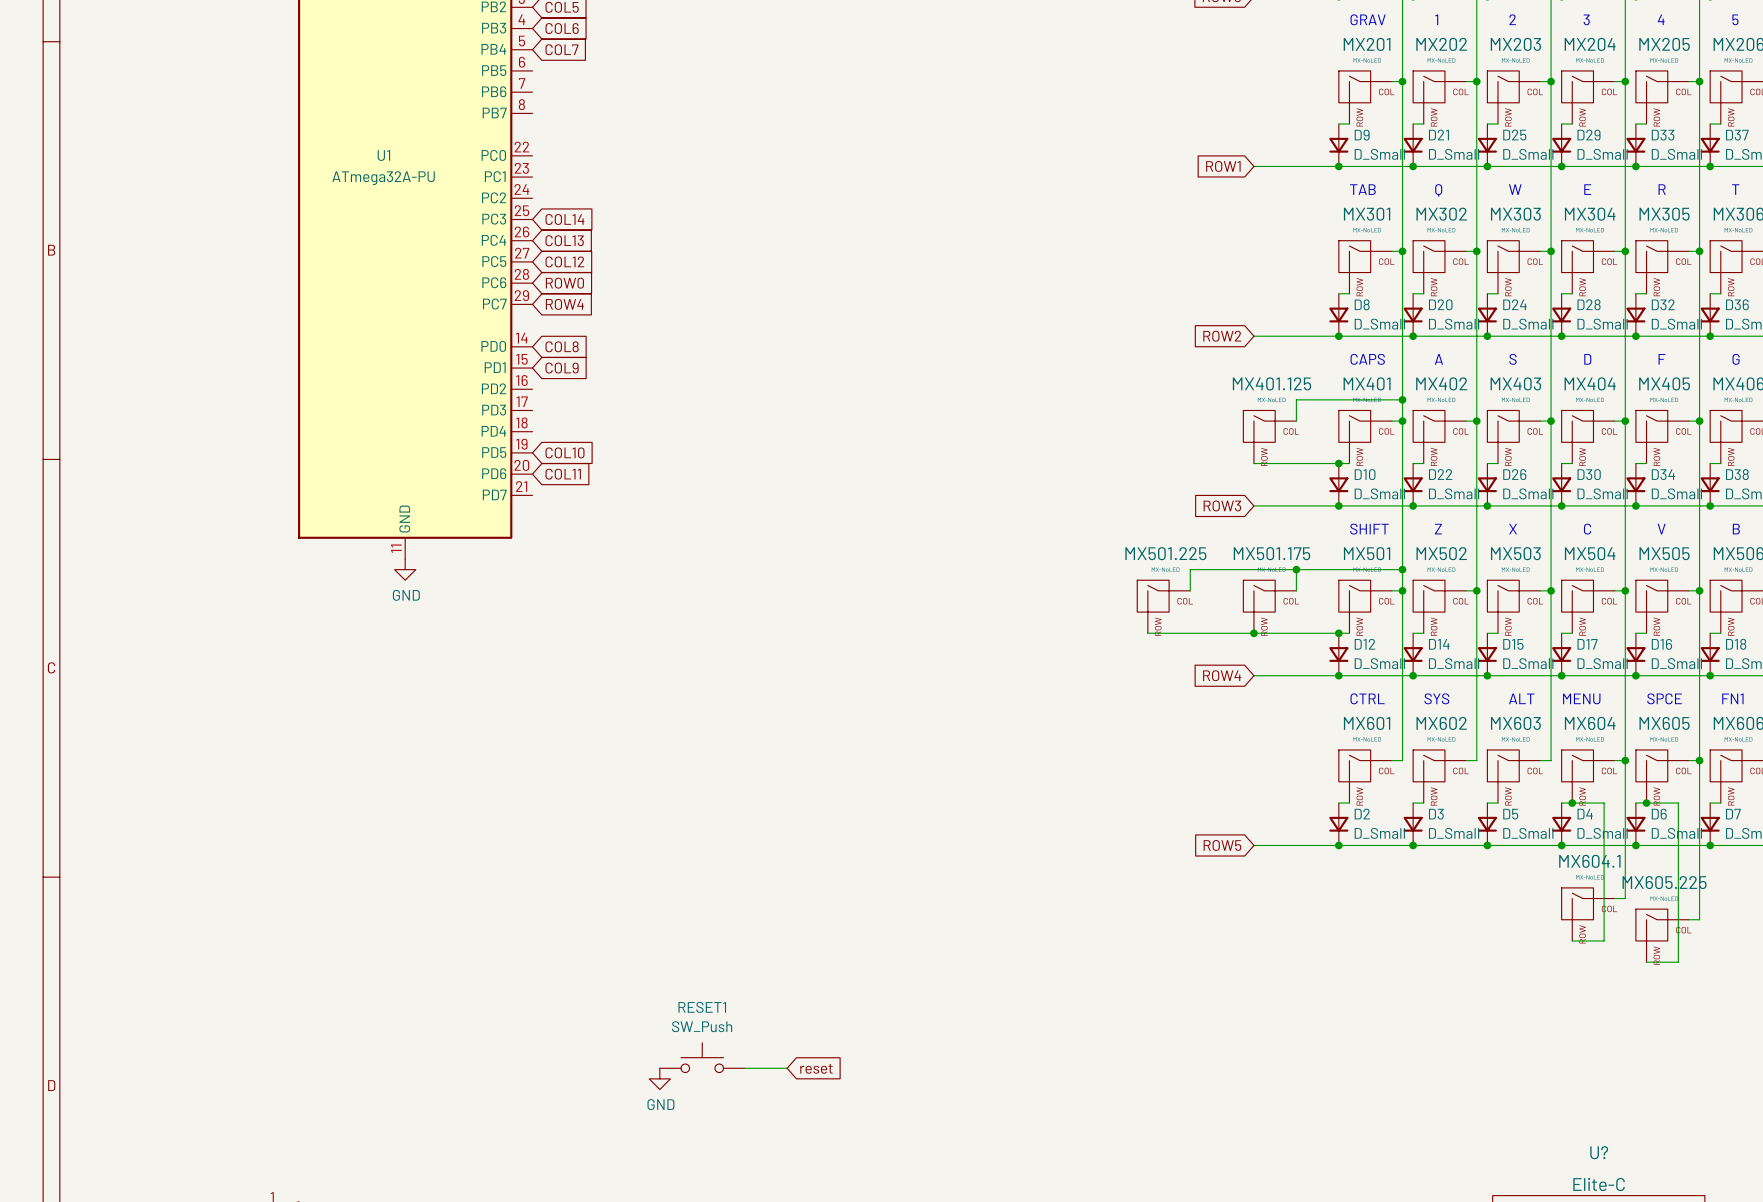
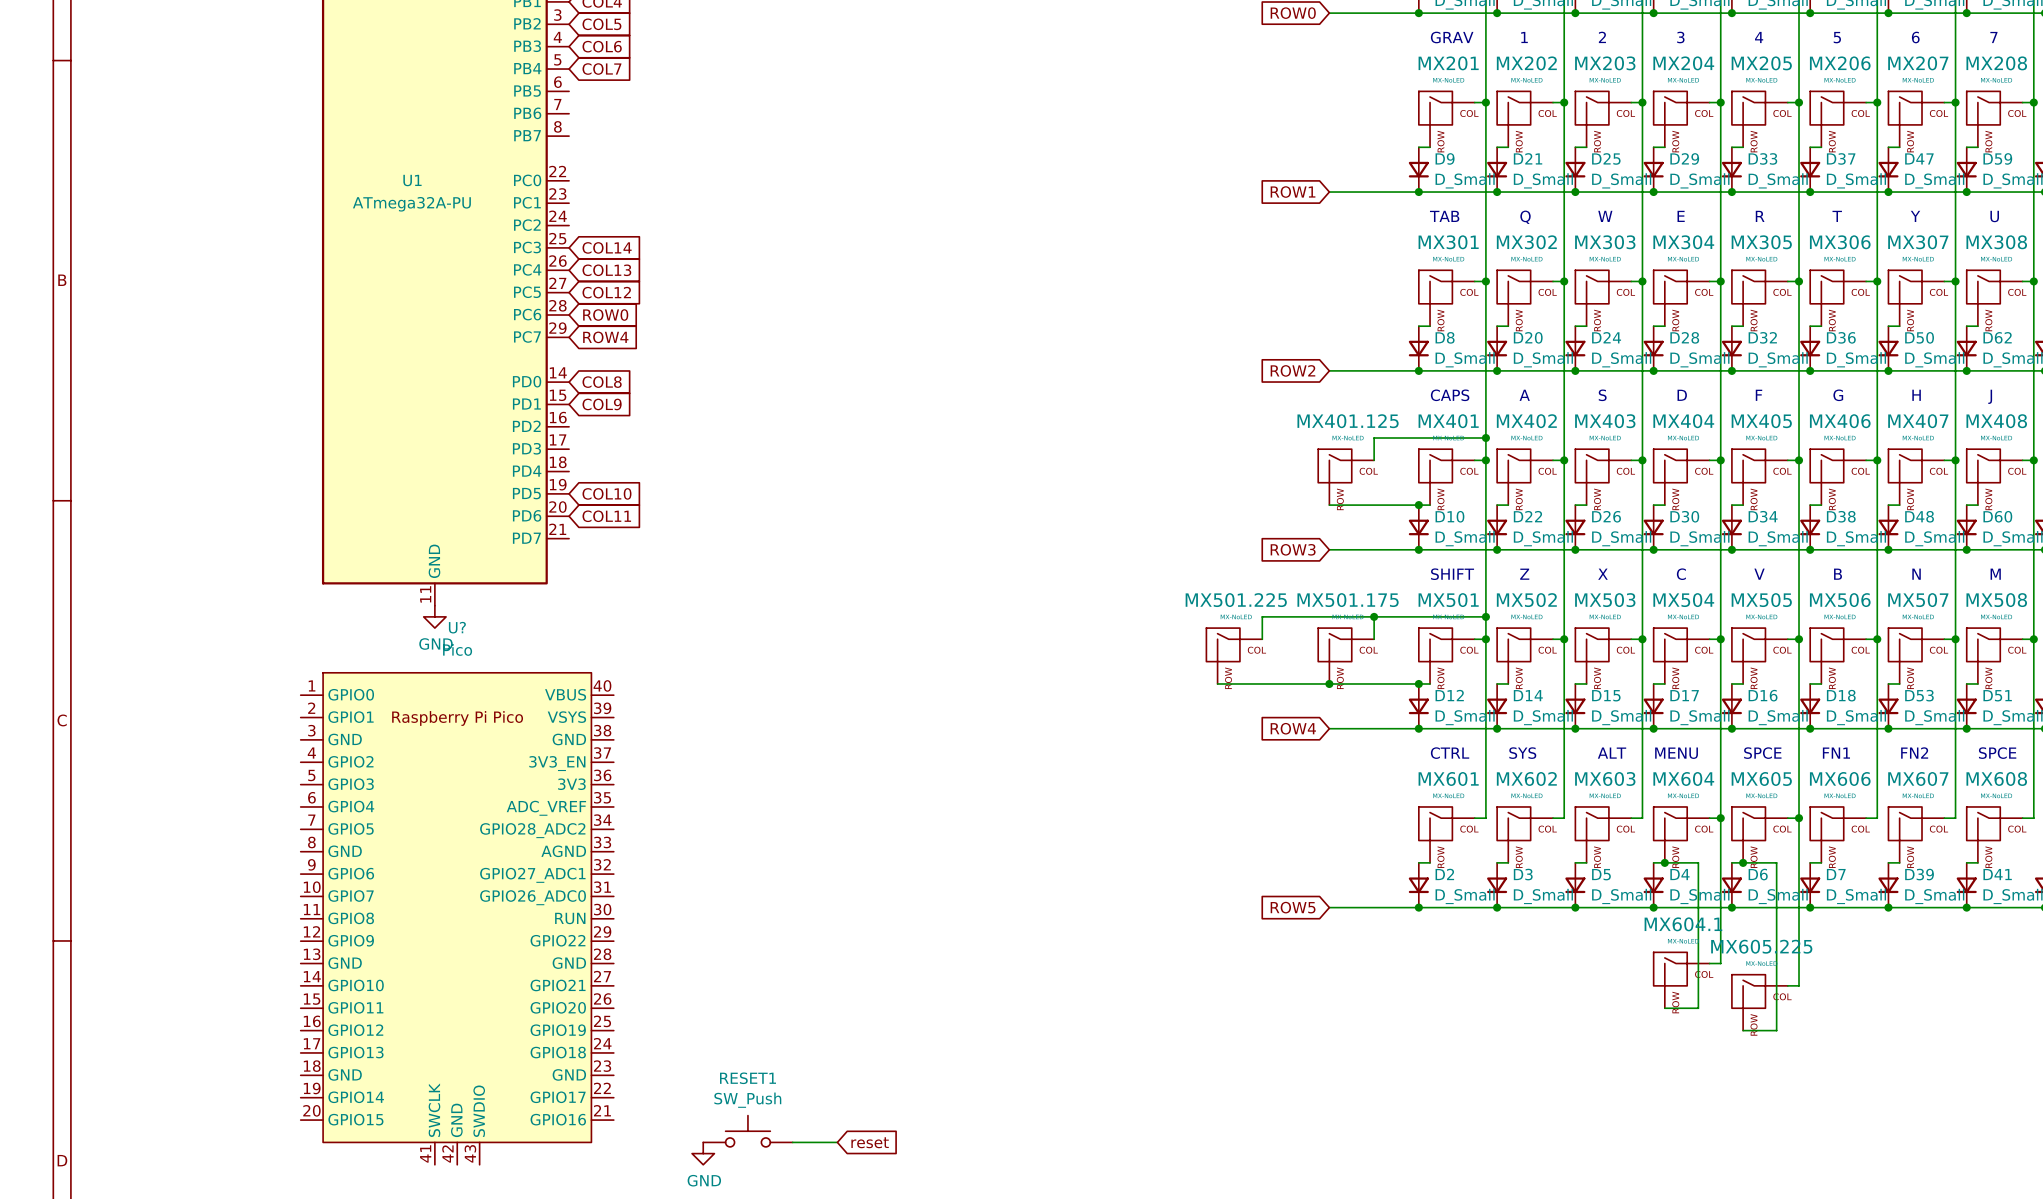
U?: none -> Pico (457, 918)

